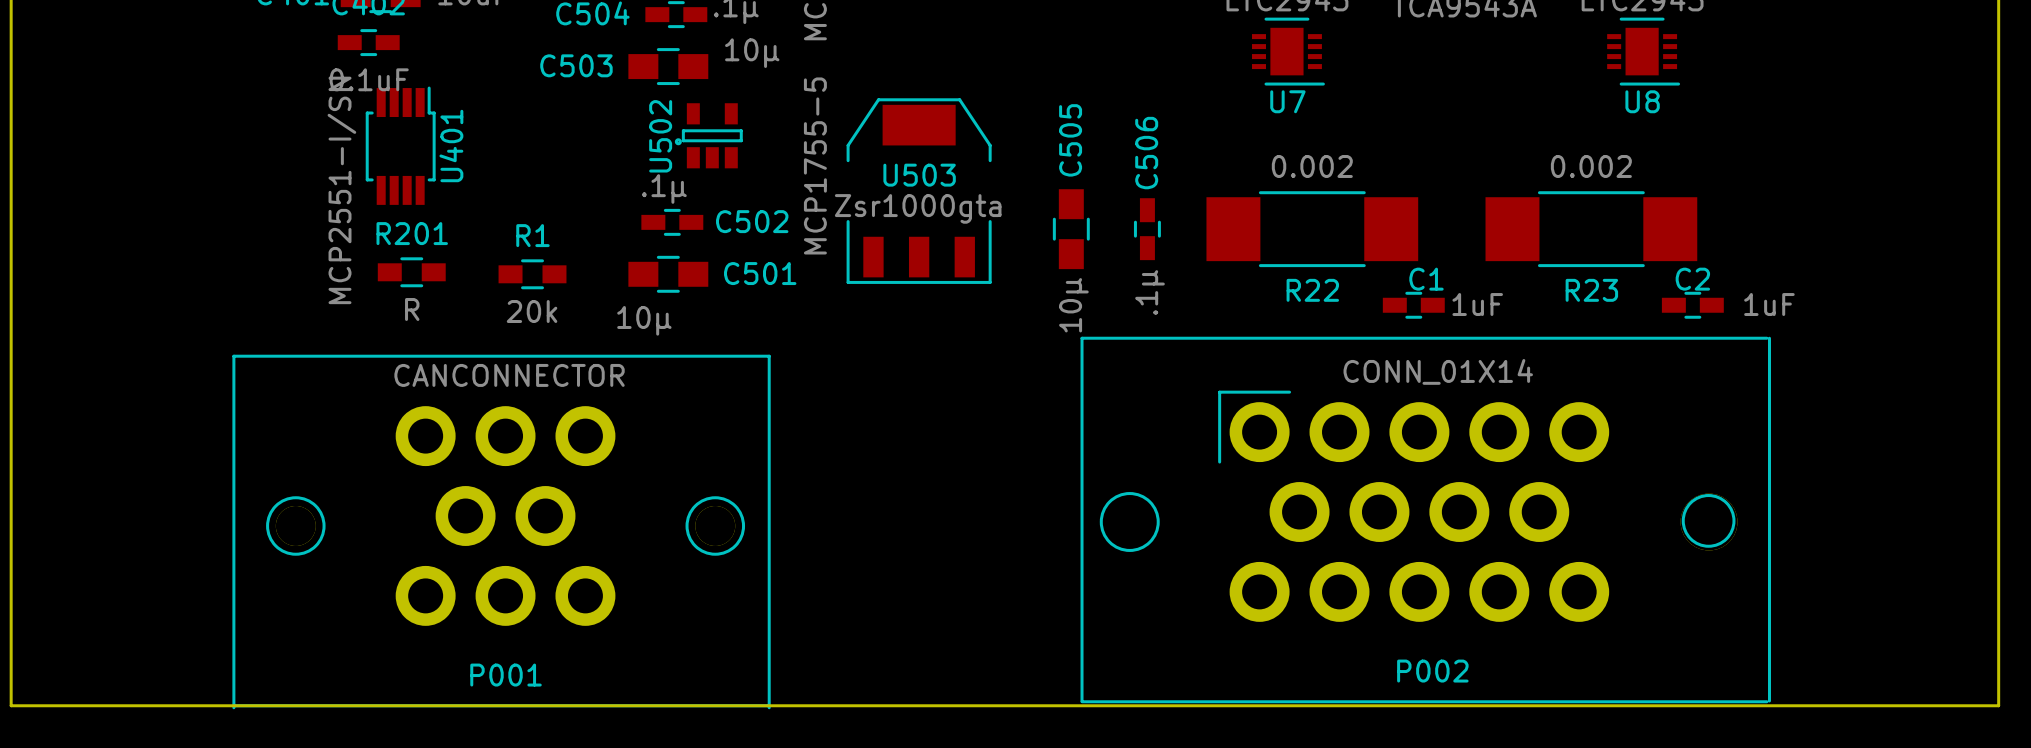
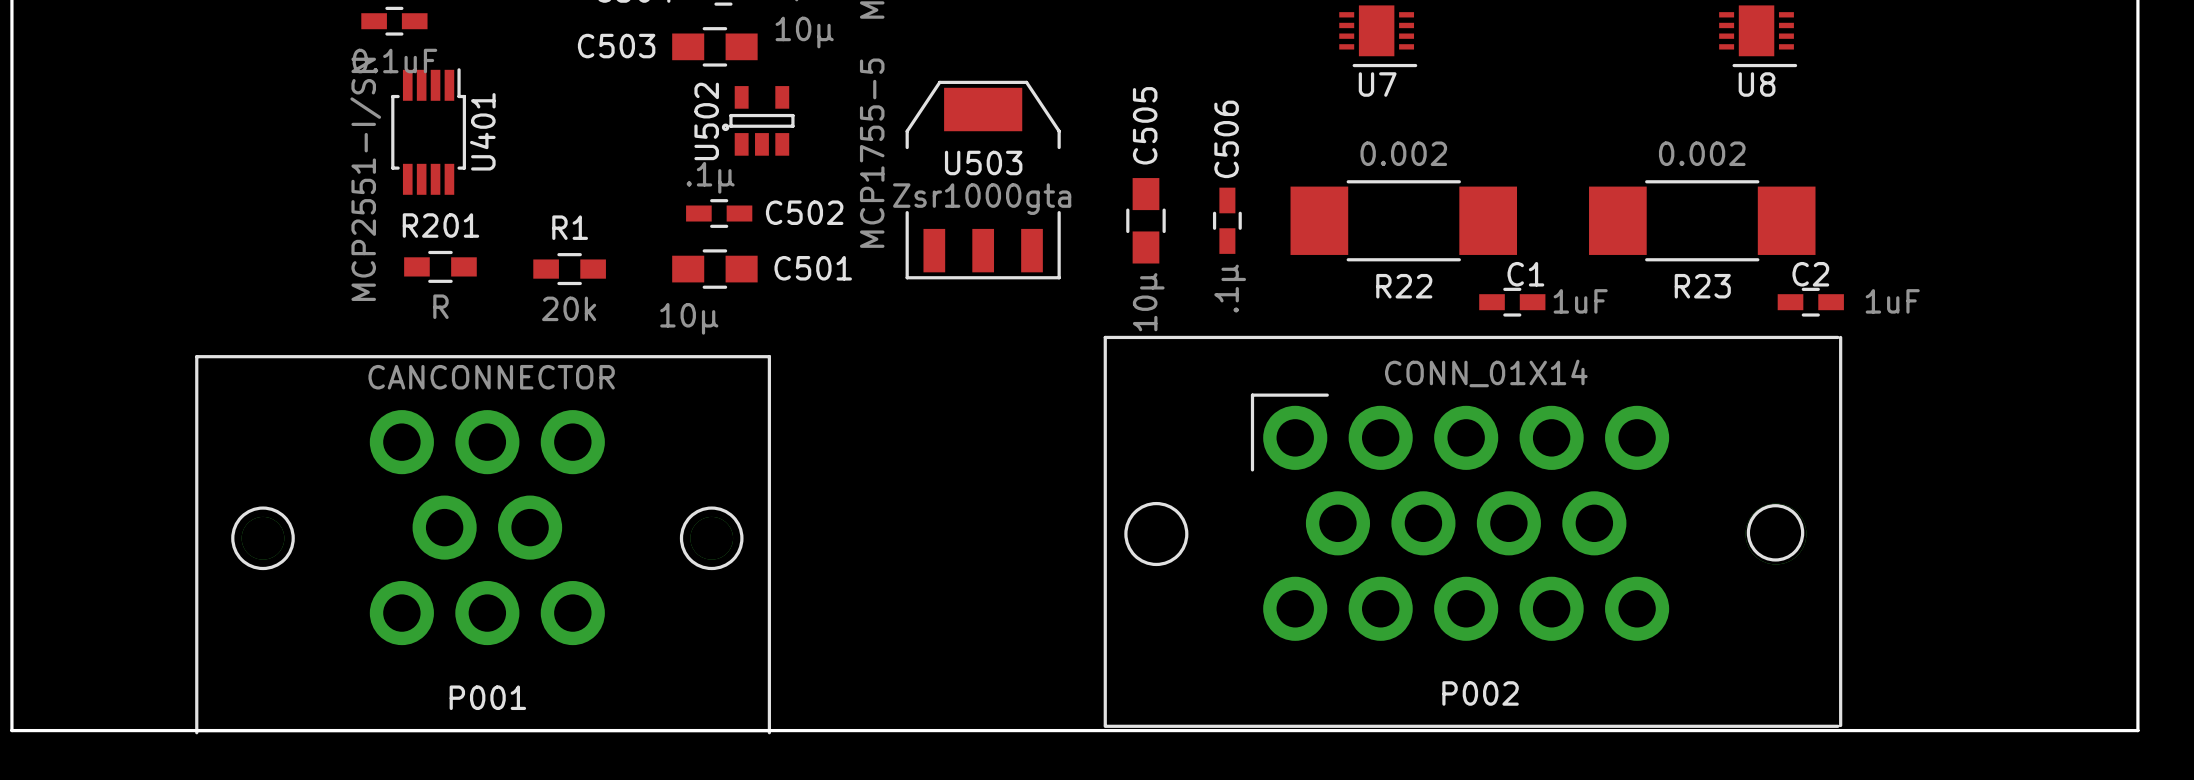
P002 position: (1425, 519) -> (1472, 531)
P001 position: (501, 531) -> (483, 544)

